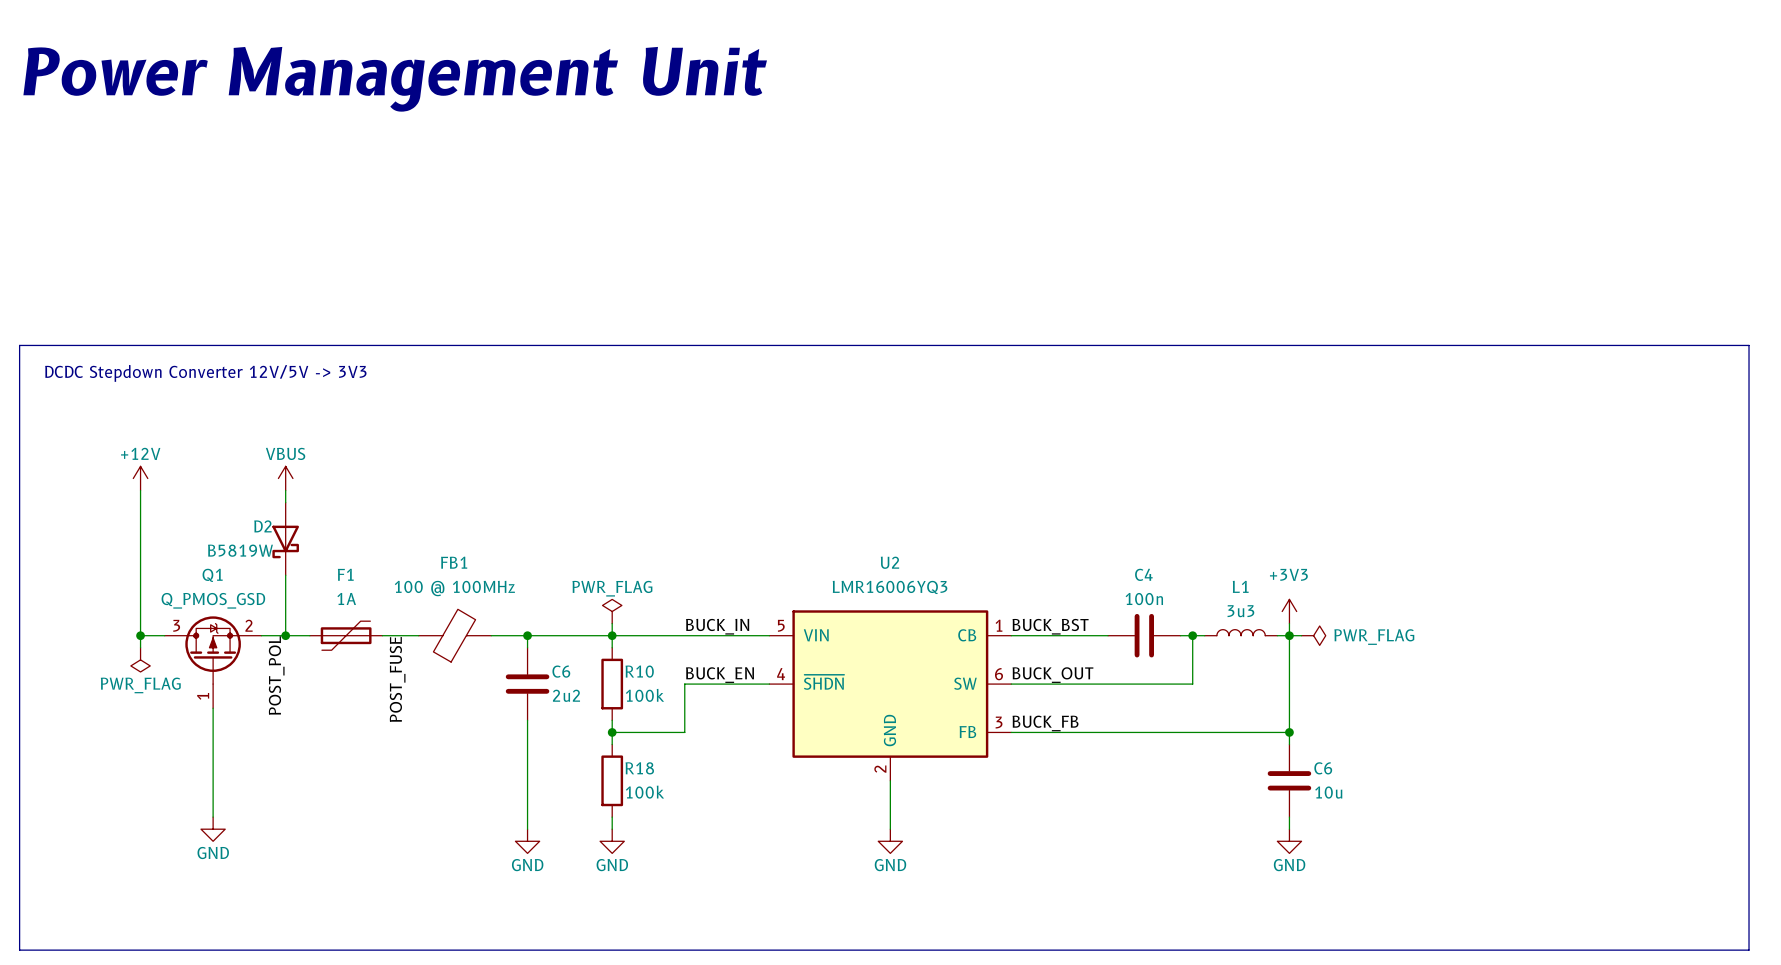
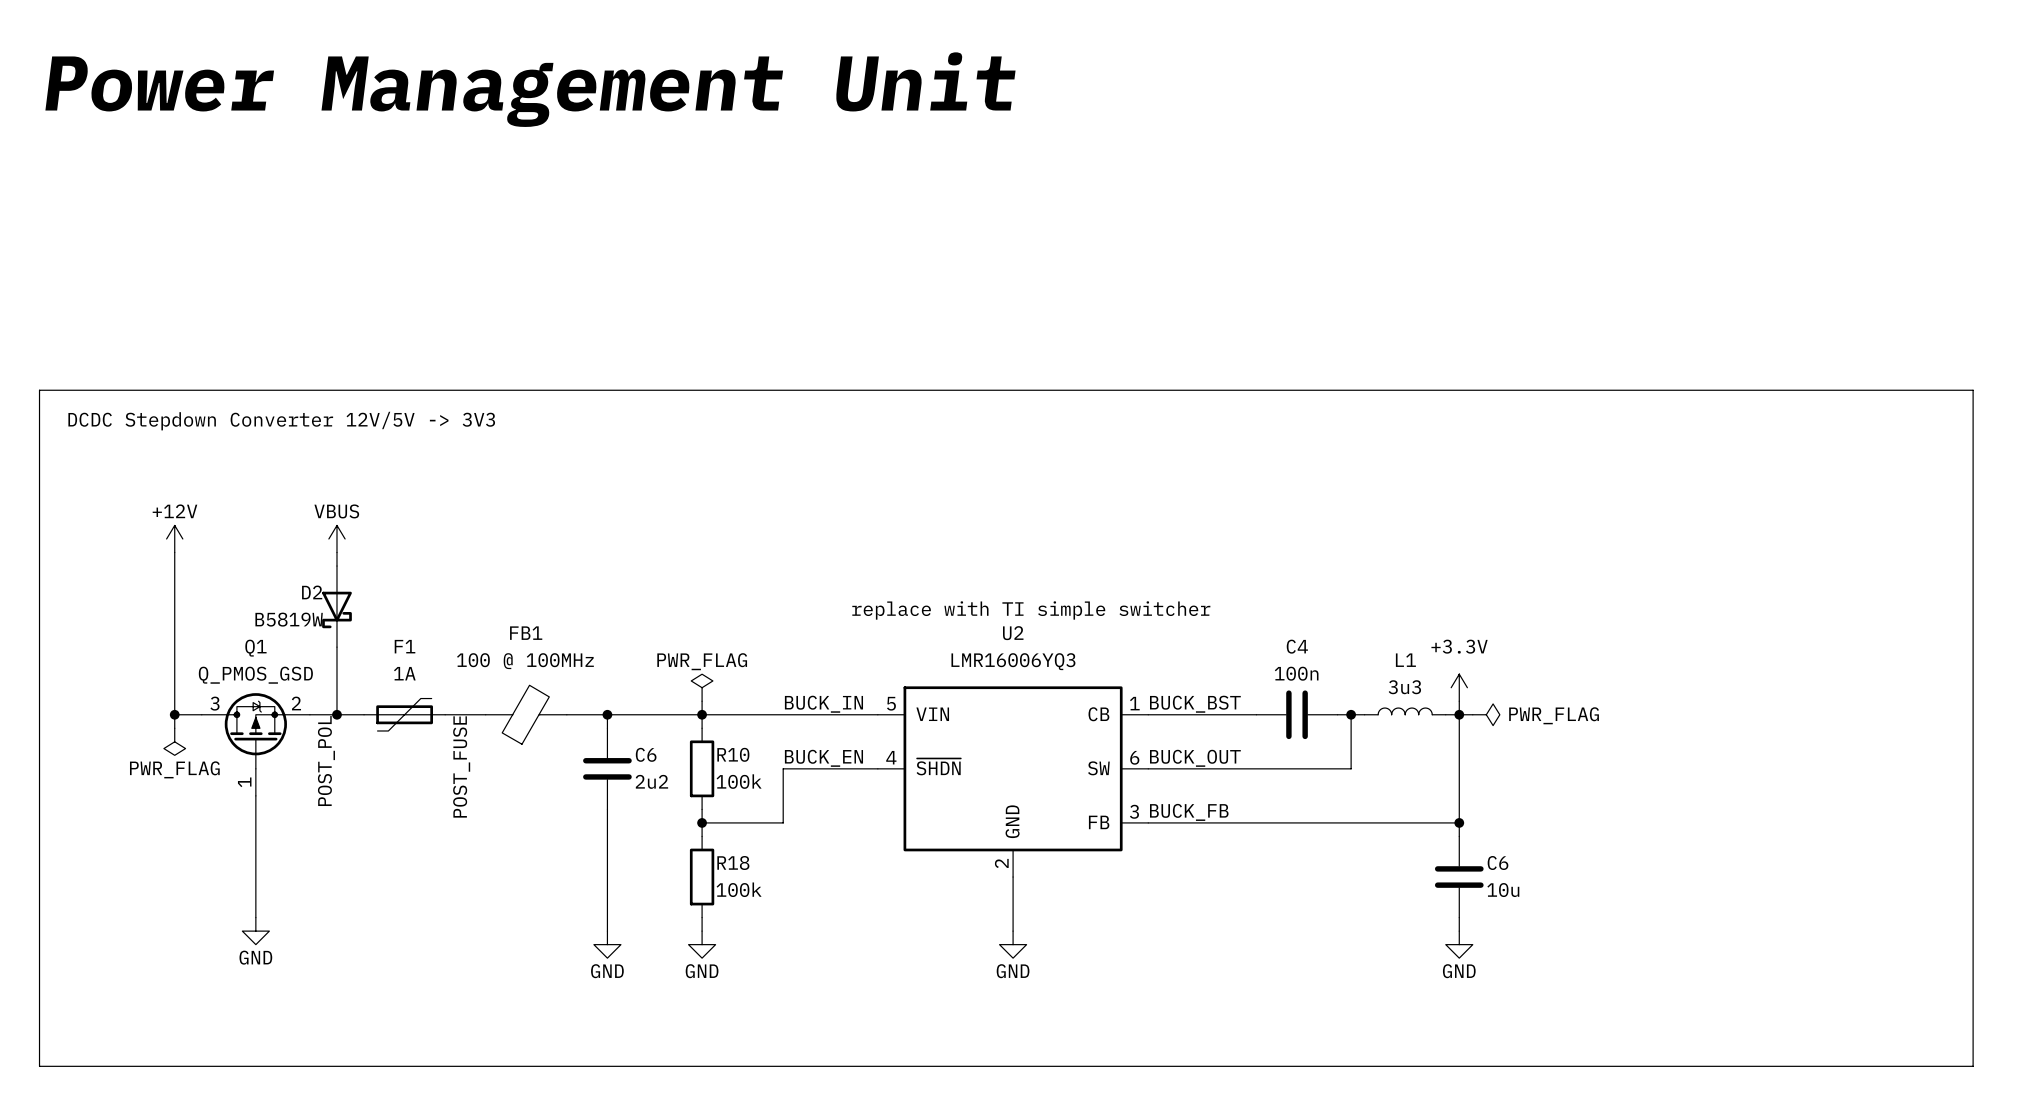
text: none -> replace with TI simple switcher (1031, 610)
power symbol: +3V3 (1289, 611) -> +3.3V (1459, 687)

